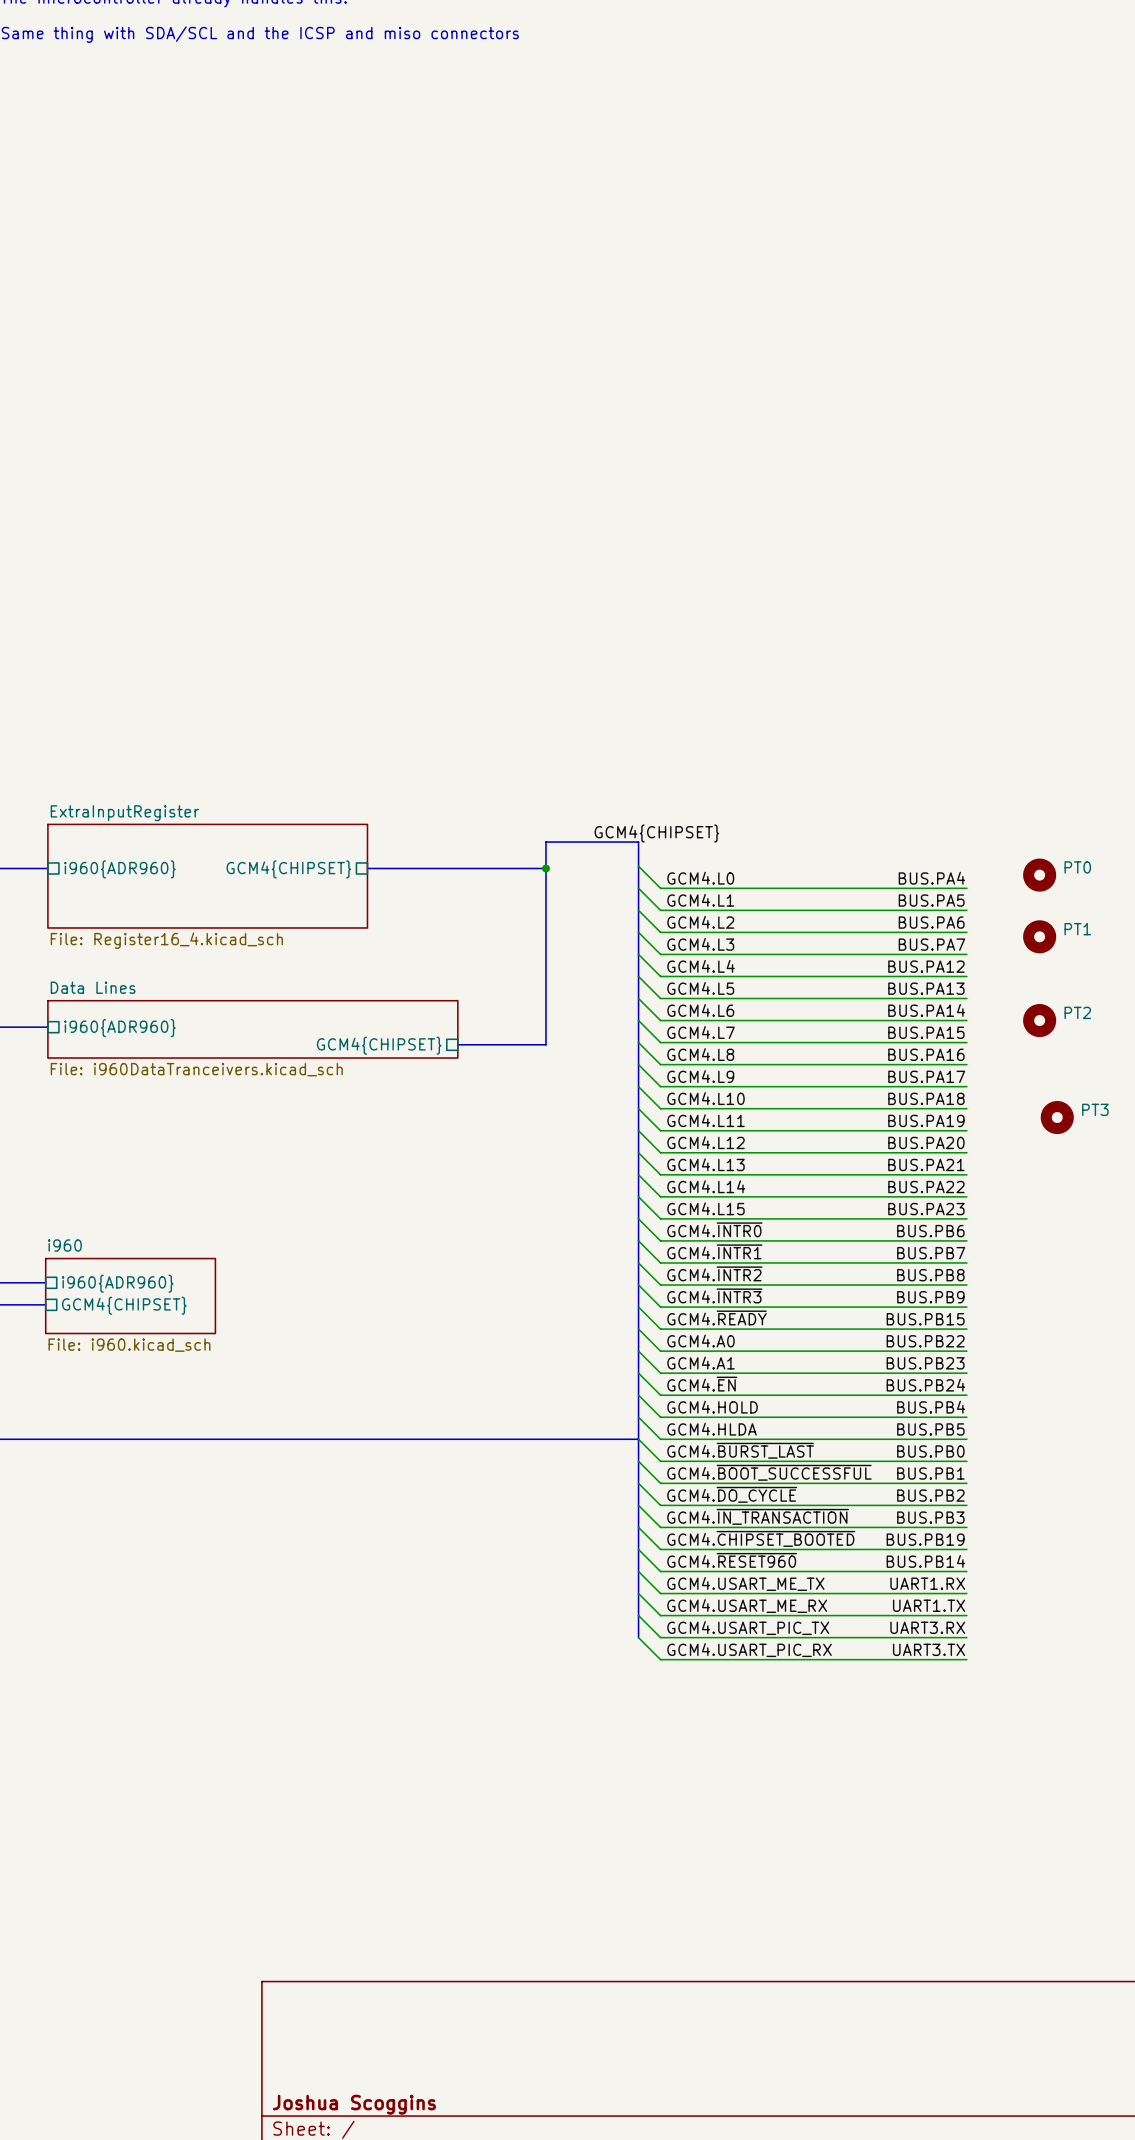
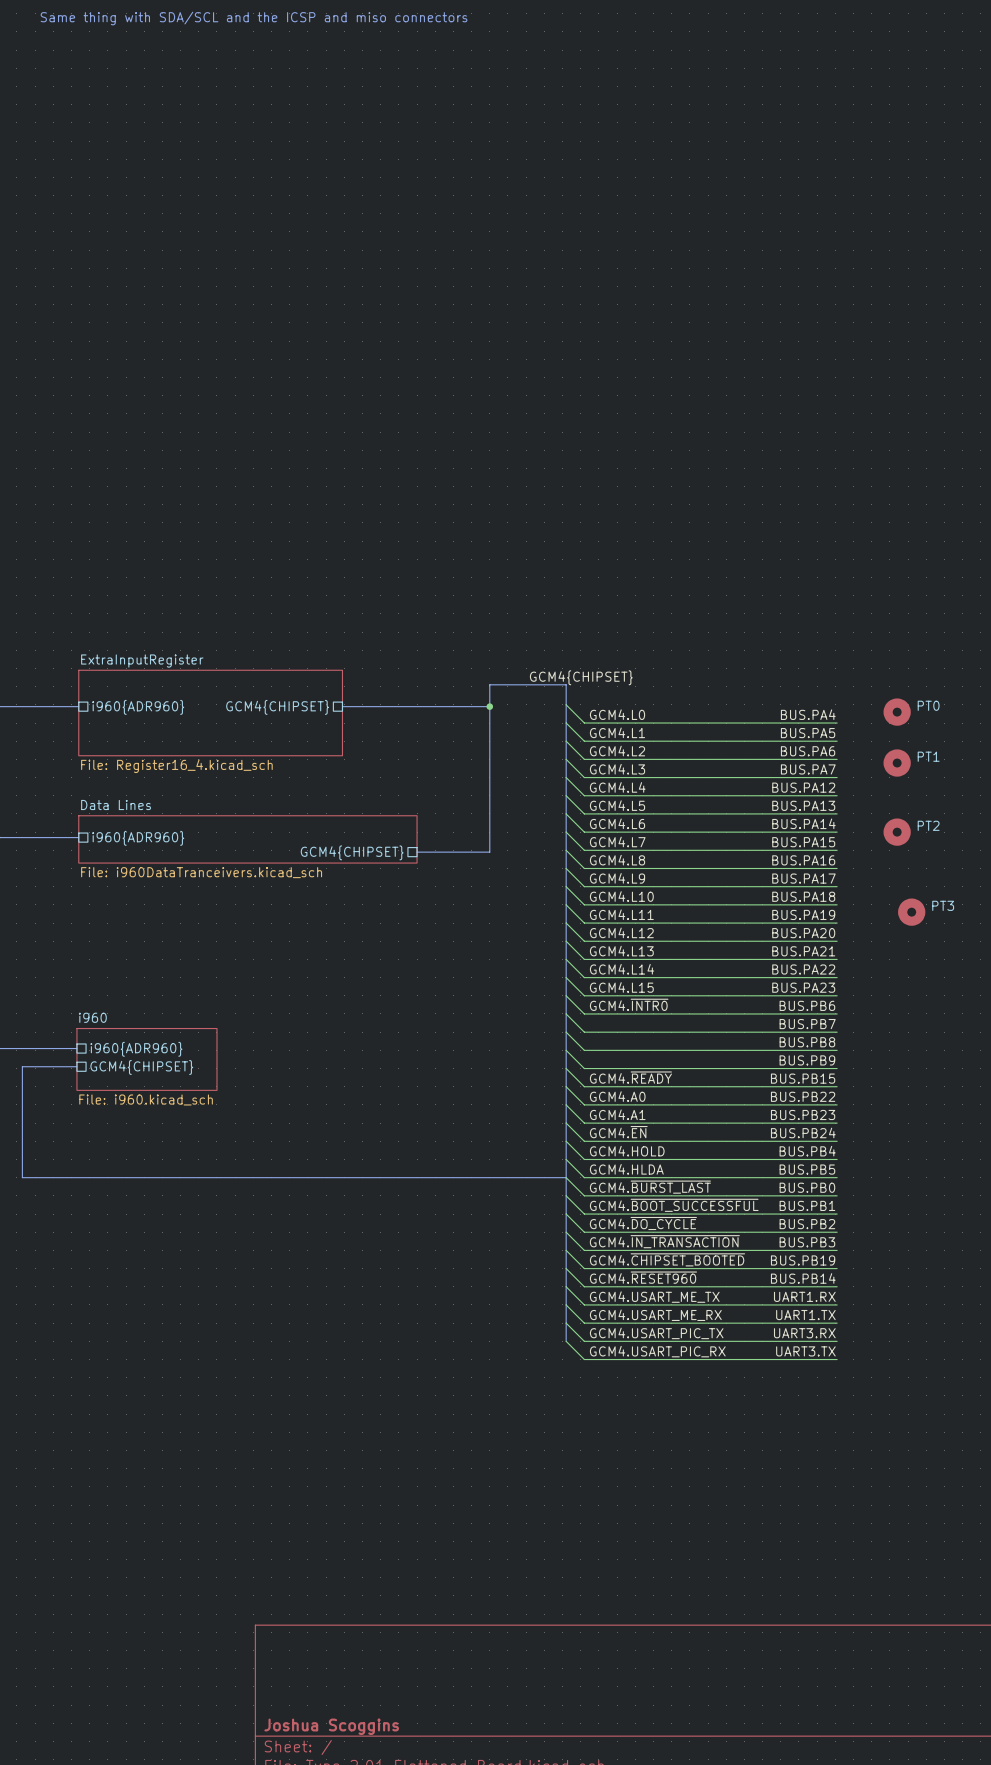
label: GCM4.~{INTR1} (714, 1251) -> none
label: GCM4.~{INTR2} (714, 1273) -> none
label: GCM4.~{INTR3} (714, 1295) -> none

